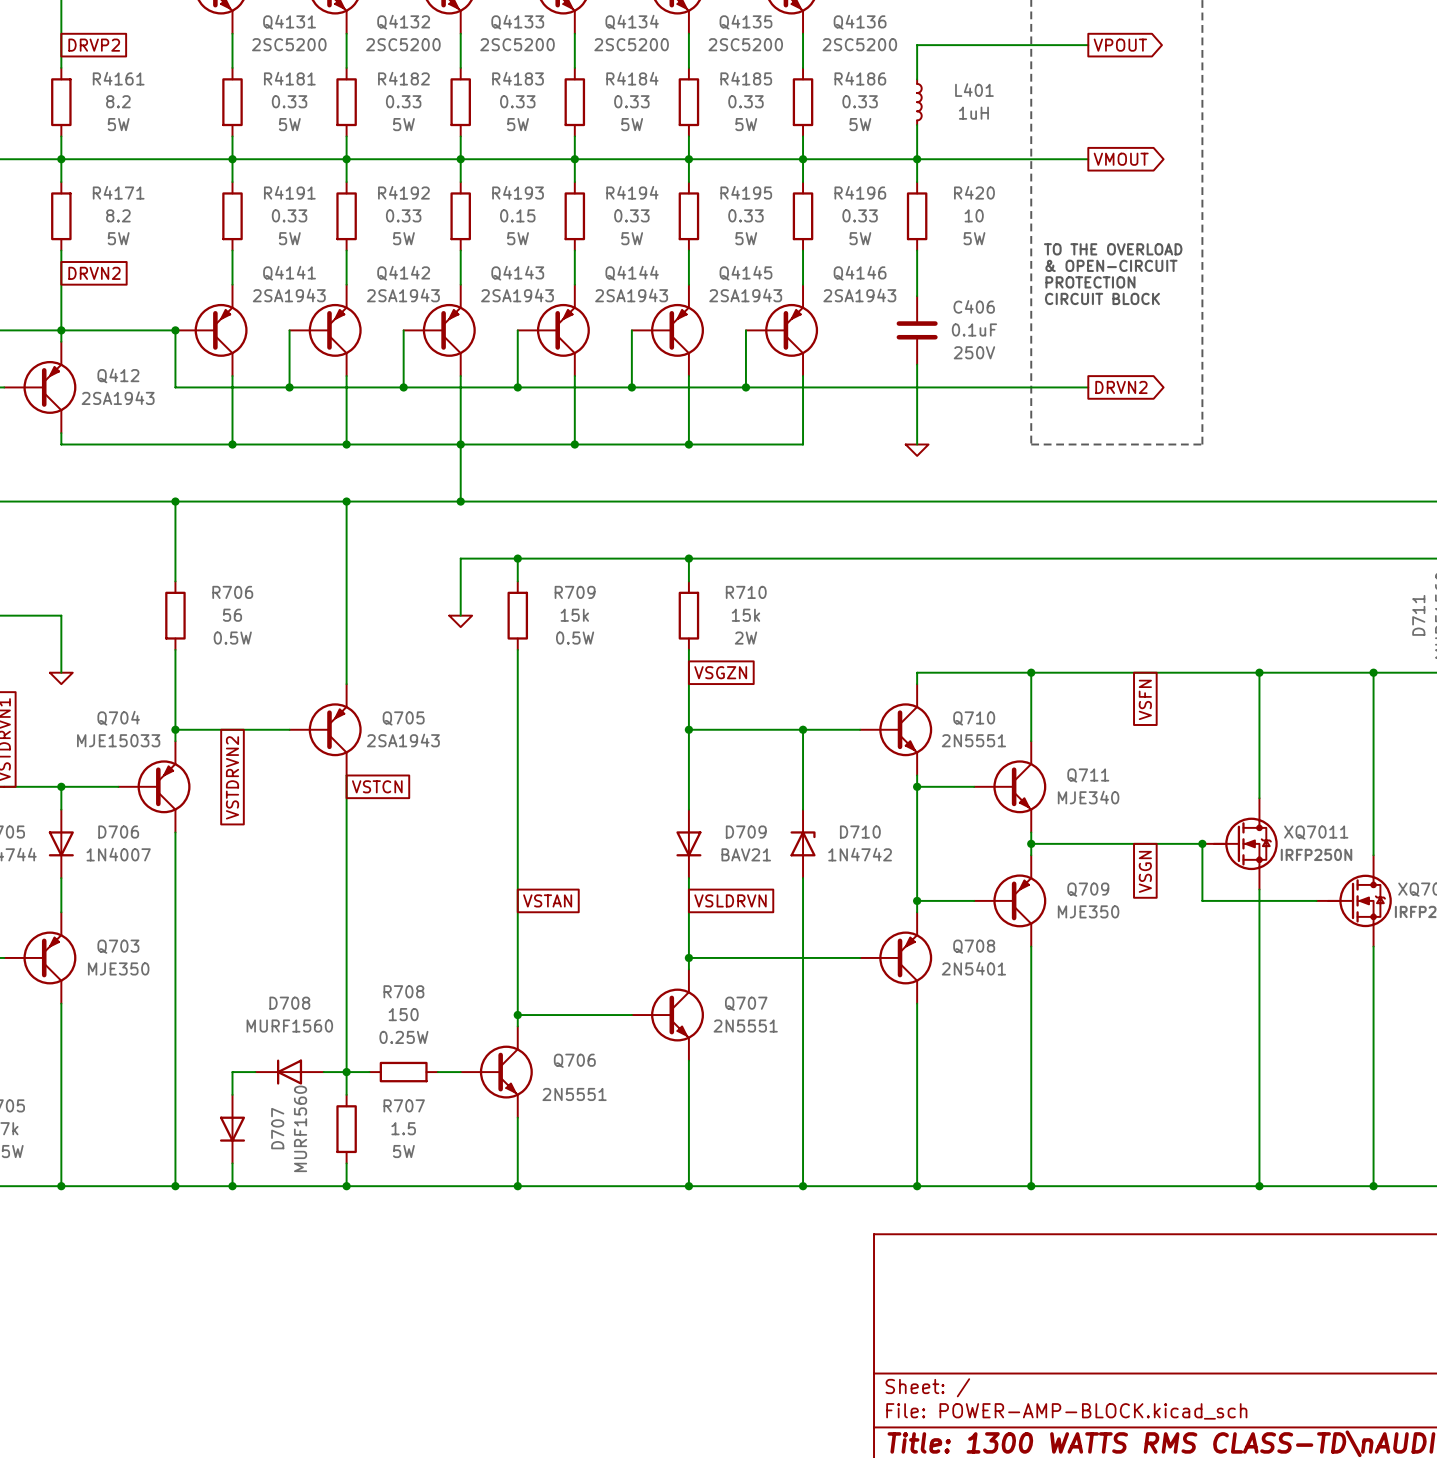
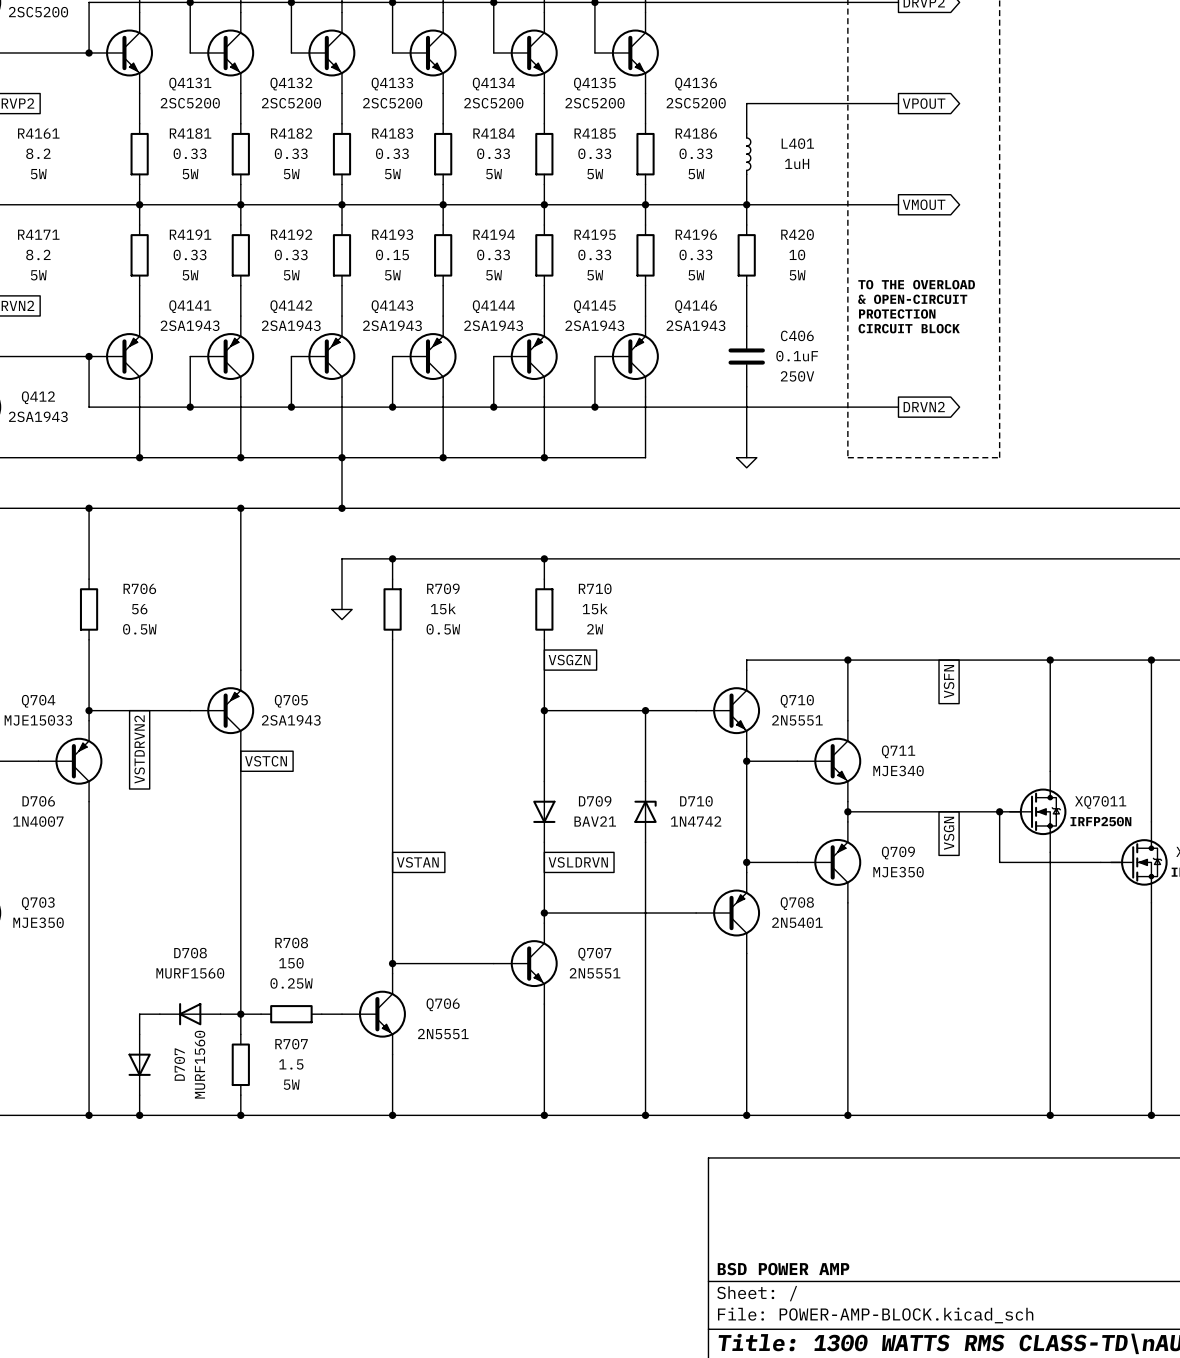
title block: none -> BSD POWER AMP (783, 1269)

